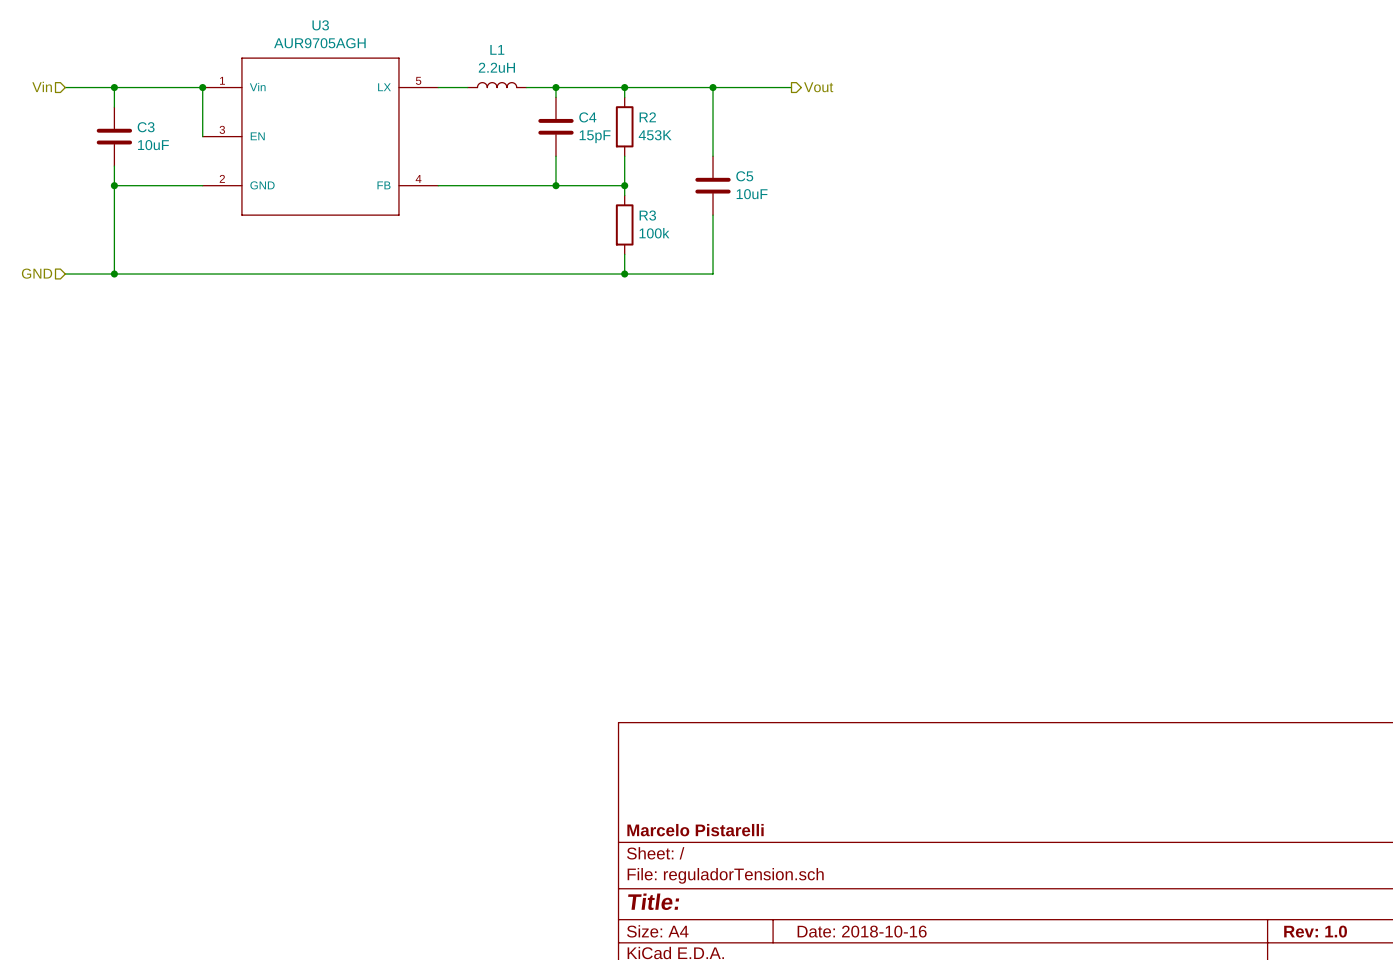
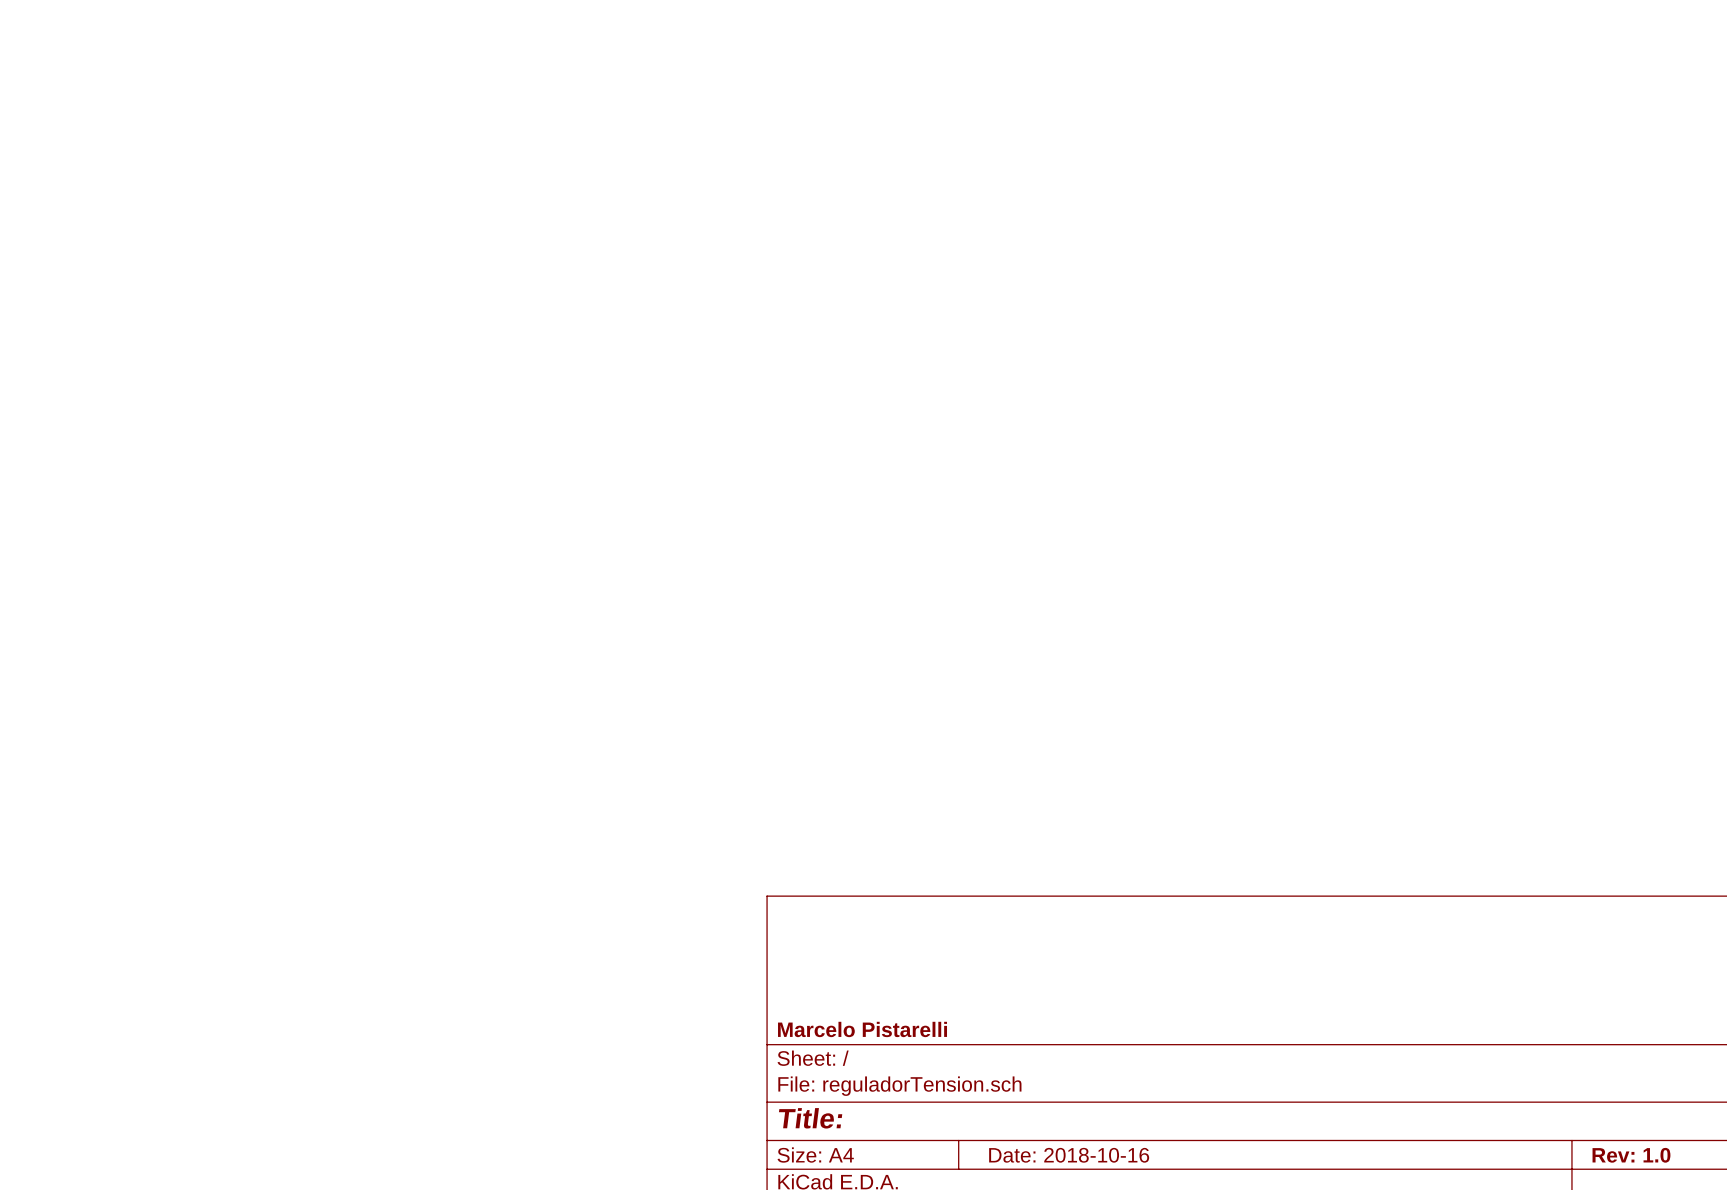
L1: 2.2uH (497, 85) -> none
hierarchical label: Vin (42, 86) -> none
wire: (65, 87) (202, 87) (202, 136) -> none
wire: (114, 87) (114, 107) -> none
junction: (114, 87) -> none
junction: (202, 87) -> none
wire: (438, 87) (467, 87) -> none
wire: (526, 87) (791, 87) -> none
wire: (555, 87) (555, 97) -> none
junction: (555, 87) -> none
wire: (624, 87) (624, 97) -> none
junction: (624, 87) -> none
wire: (713, 87) (713, 156) -> none
junction: (713, 87) -> none
hierarchical label: Vout (818, 87) -> none
C4: 15pF (555, 126) -> none
R2: 453K (624, 126) -> none
C3: 10uF (114, 136) -> none
U3: AUR9705AGH (320, 136) -> none
wire: (555, 156) (555, 185) -> none
wire: (624, 156) (624, 195) -> none
wire: (114, 166) (114, 274) -> none
wire: (114, 185) (202, 185) -> none
junction: (114, 185) -> none
wire: (438, 185) (624, 185) -> none
junction: (555, 185) -> none
junction: (624, 185) -> none
C5: 10uF (713, 185) -> none
wire: (713, 215) (713, 274) (65, 274) -> none
R3: 100k (624, 224) -> none
wire: (624, 254) (624, 274) -> none
hierarchical label: GND (37, 273) -> none
junction: (114, 274) -> none
junction: (624, 274) -> none

